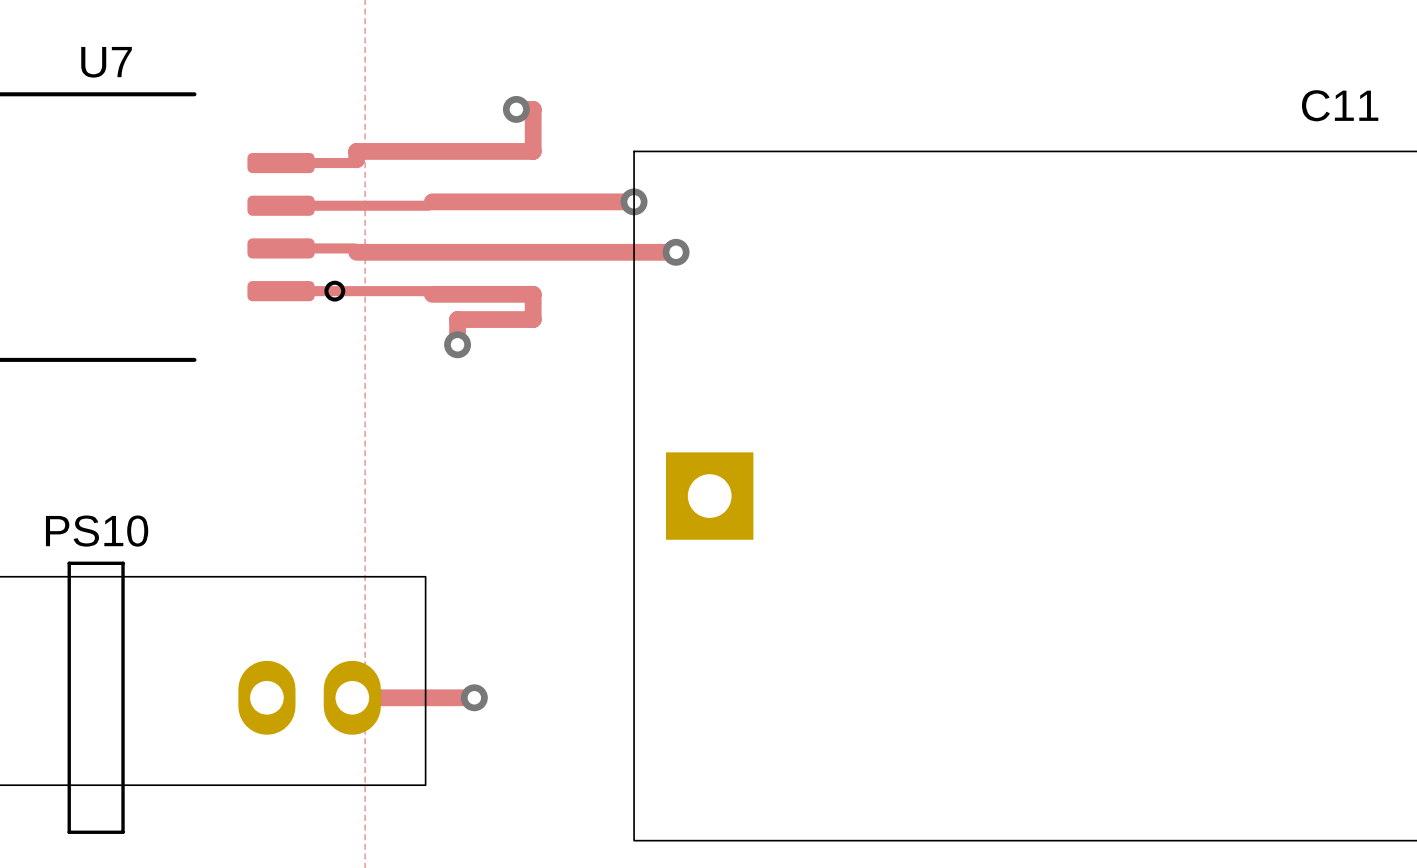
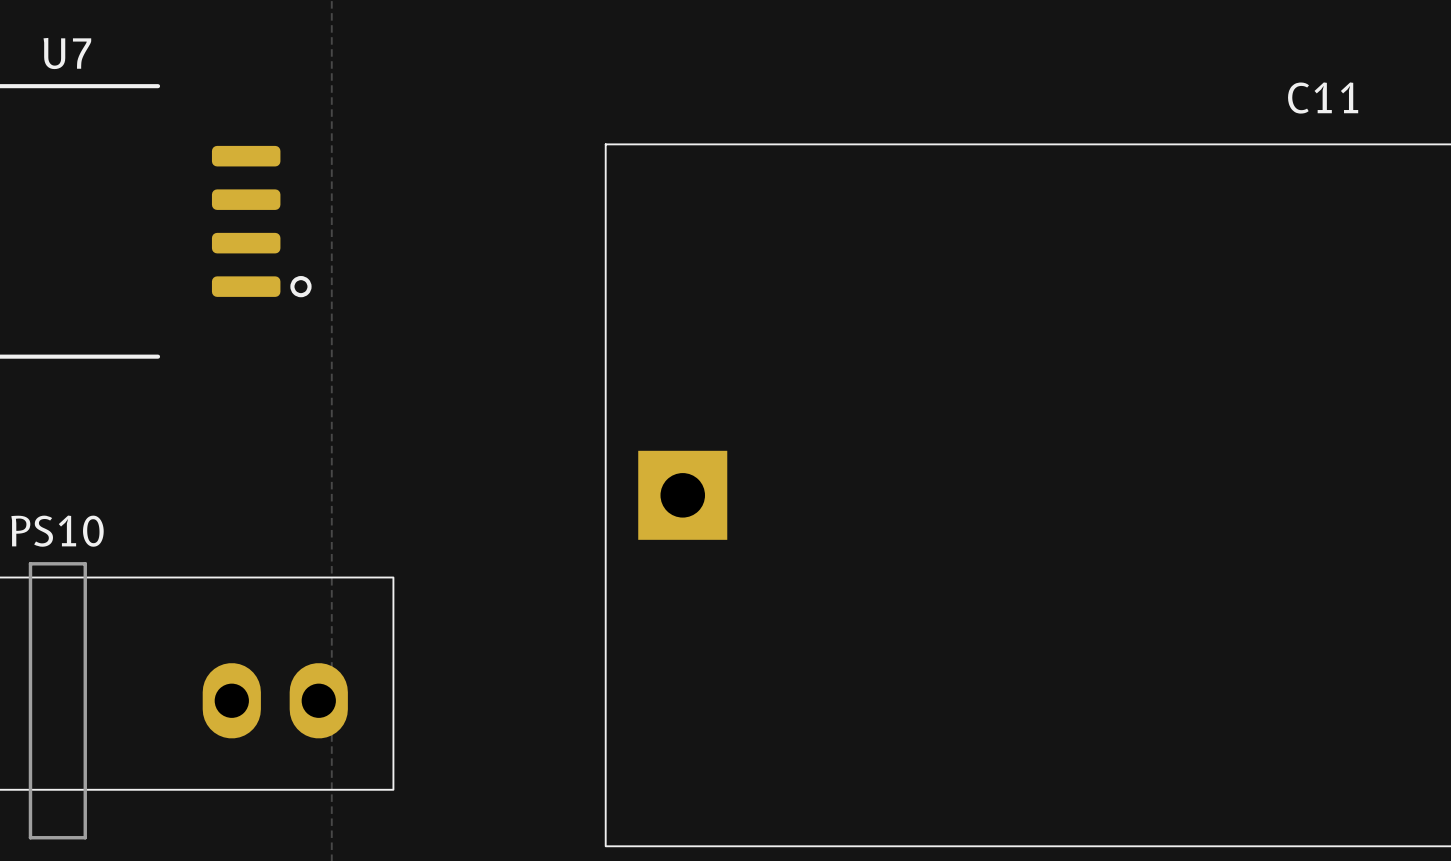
track: (516, 109) (533, 109) (533, 151) (356, 151) (356, 159) -> none
via: (516, 109) -> none
track: (281, 163) (355, 163) -> none
track: (432, 201) (634, 201) -> none
via: (634, 201) -> none
track: (281, 205) (428, 205) -> none
track: (281, 248) (355, 248) -> none
track: (356, 252) (676, 252) -> none
via: (676, 252) -> none
track: (281, 291) (428, 291) -> none
track: (432, 294) (533, 294) (533, 319) (457, 319) (457, 344) -> none
via: (457, 344) -> none
track: (348, 697) (474, 697) -> none
via: (474, 697) -> none

